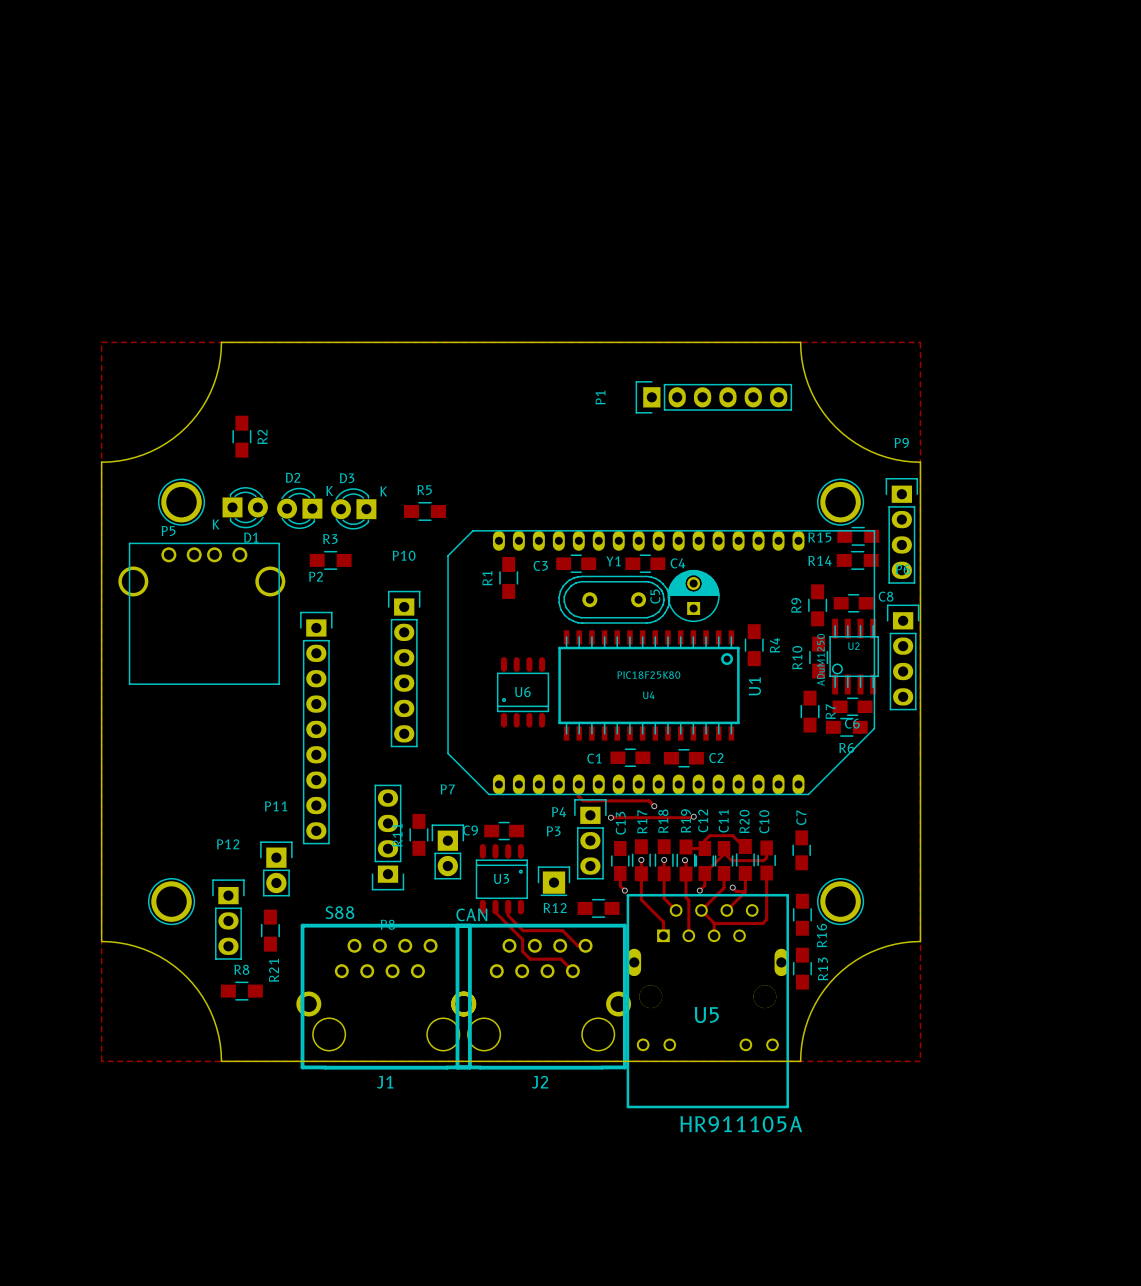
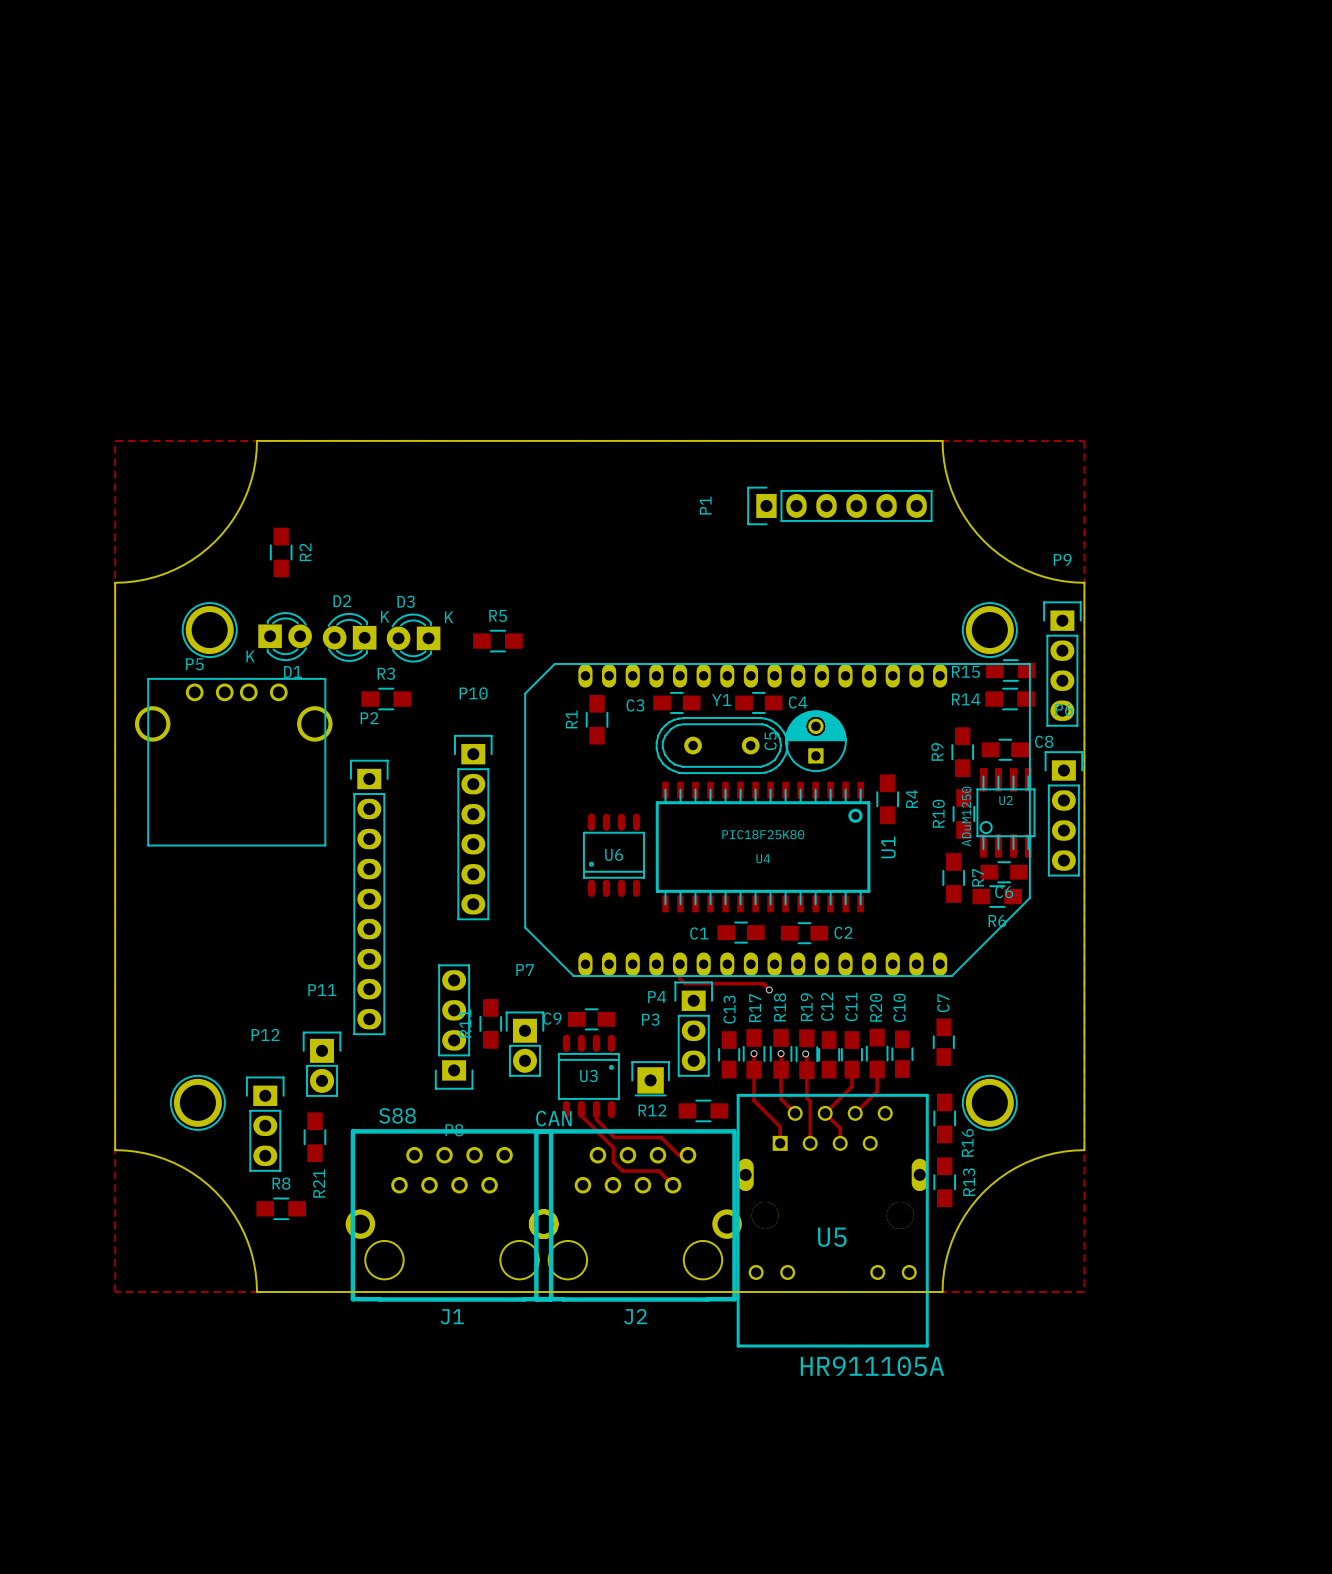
track: (693, 816) (610, 817) -> none
via: (693, 816) -> none
via: (610, 817) -> none
track: (745, 846) (732, 835) (709, 835) (704, 840) (704, 848) (686, 846) -> none
track: (766, 847) (766, 857) (763, 860) (731, 860) (724, 852) -> none
track: (724, 848) (724, 854) (704, 873) (704, 885) (699, 890) -> none
track: (766, 872) (766, 919) (762, 923) (714, 923) -> none
track: (620, 873) (620, 886) (624, 890) -> none
track: (732, 887) (736, 891) (745, 891) -> none
via: (732, 887) -> none
via: (624, 890) -> none
via: (699, 890) -> none

